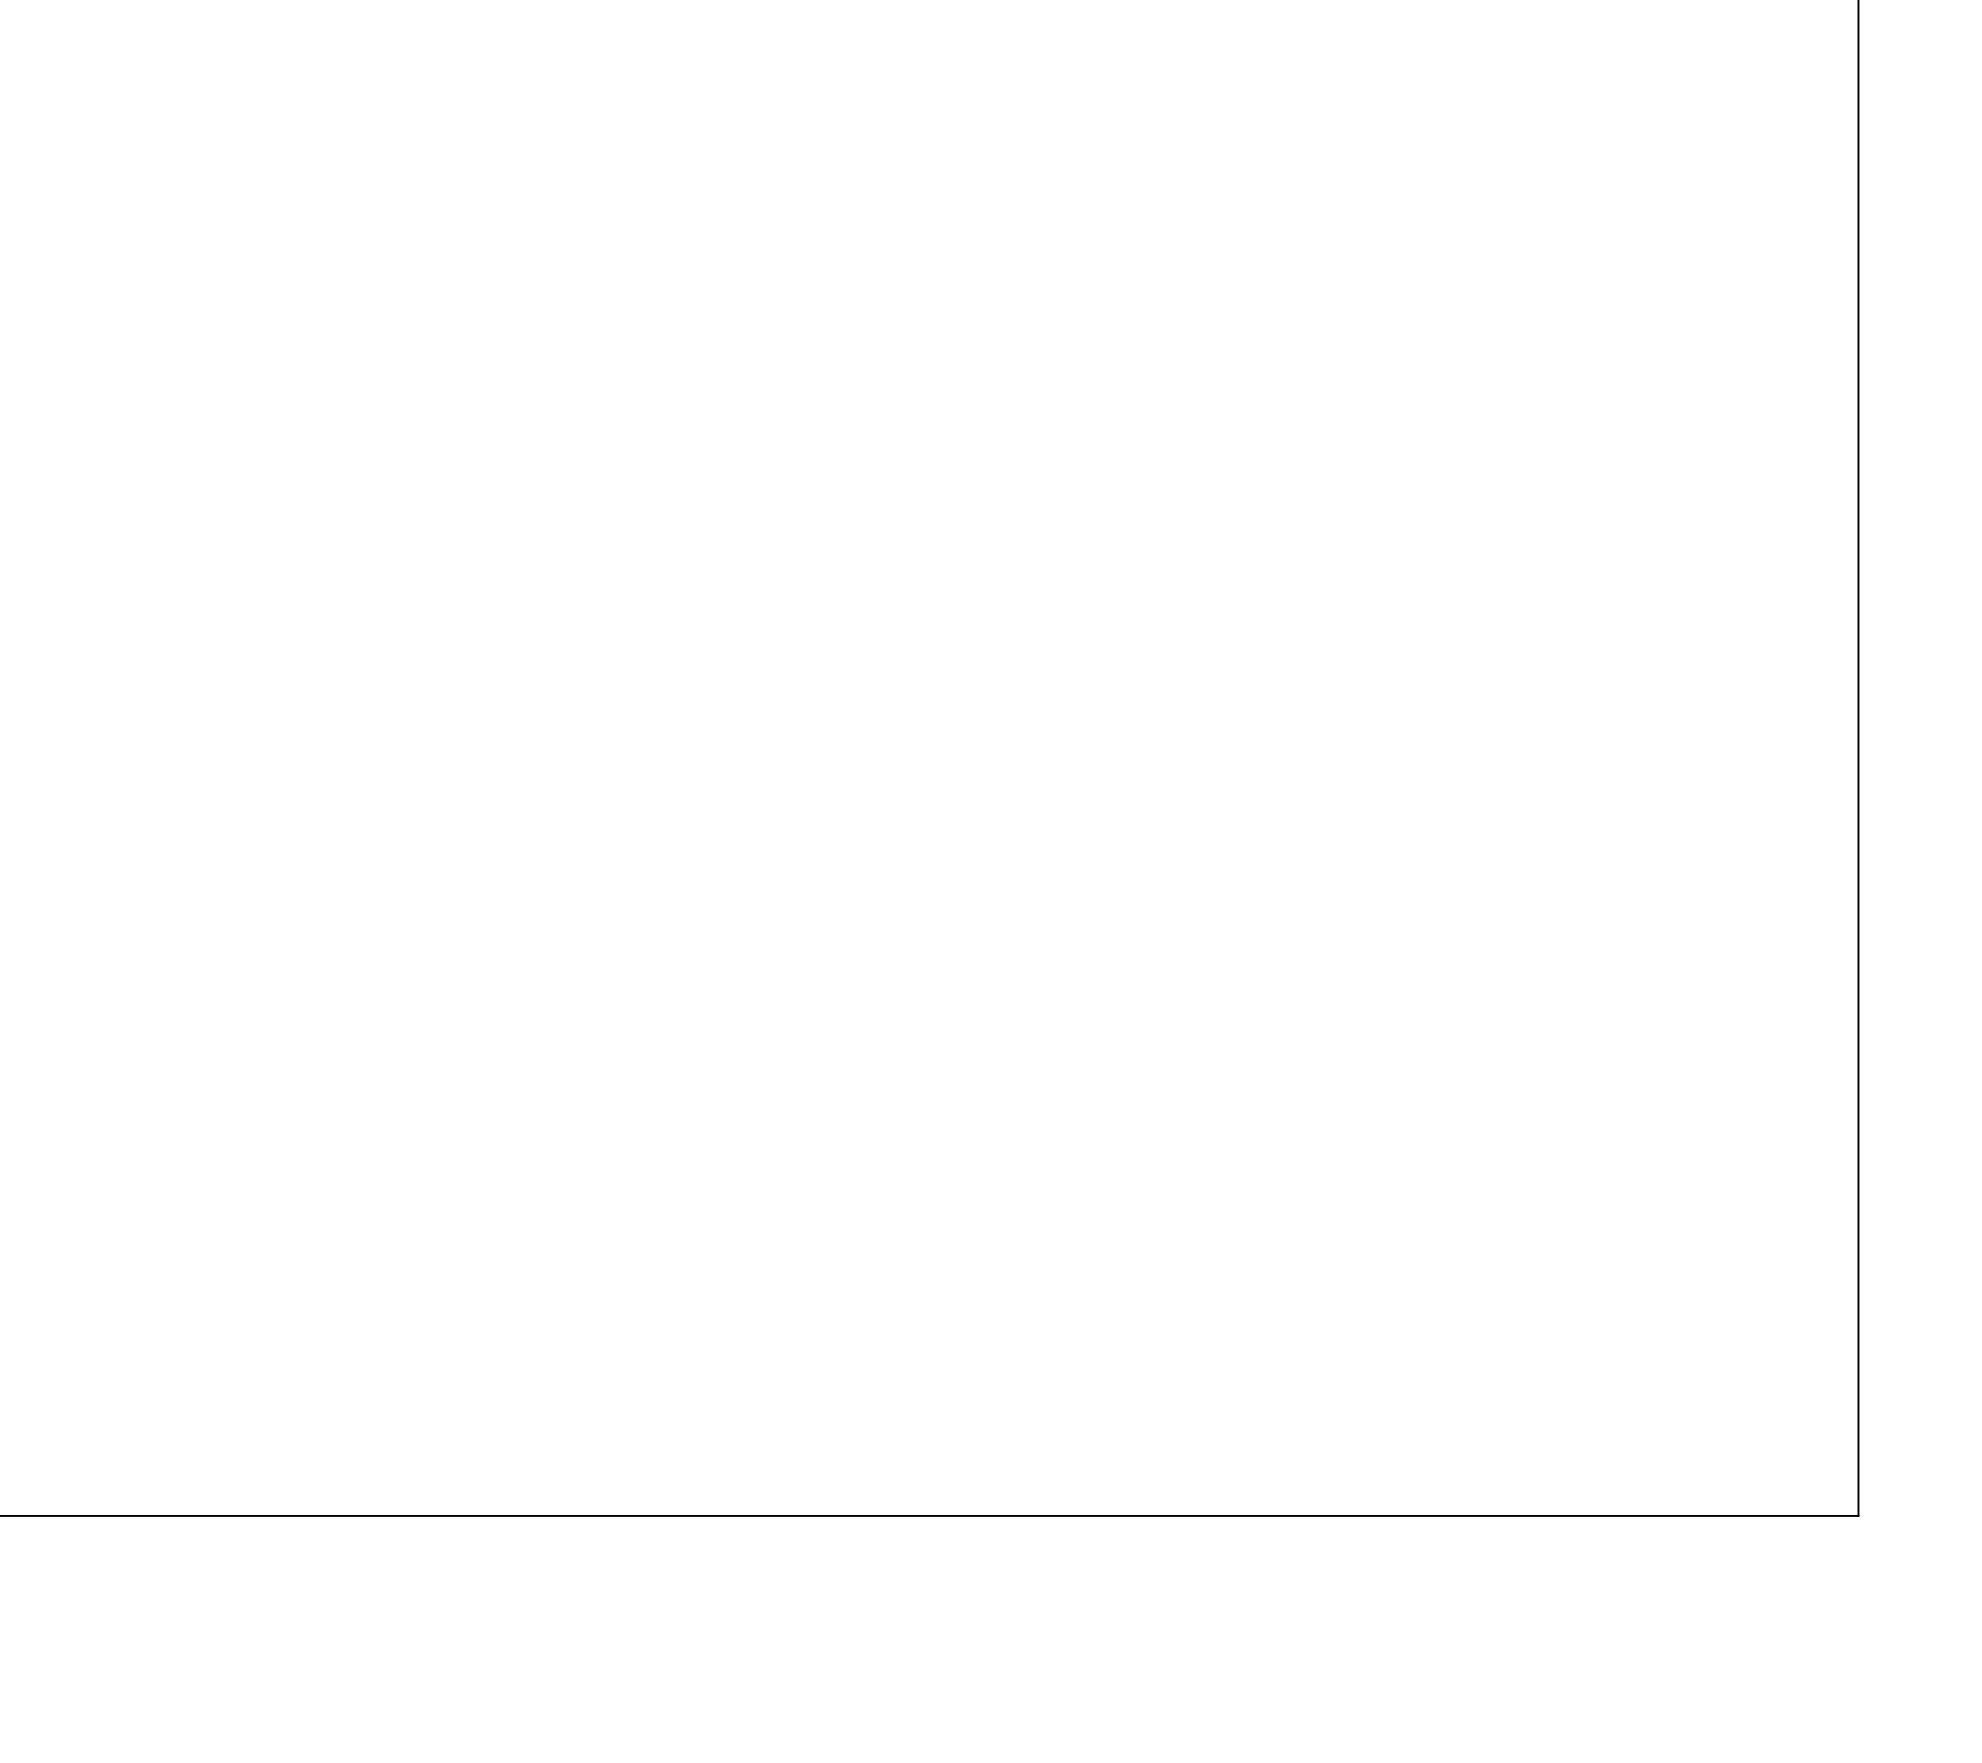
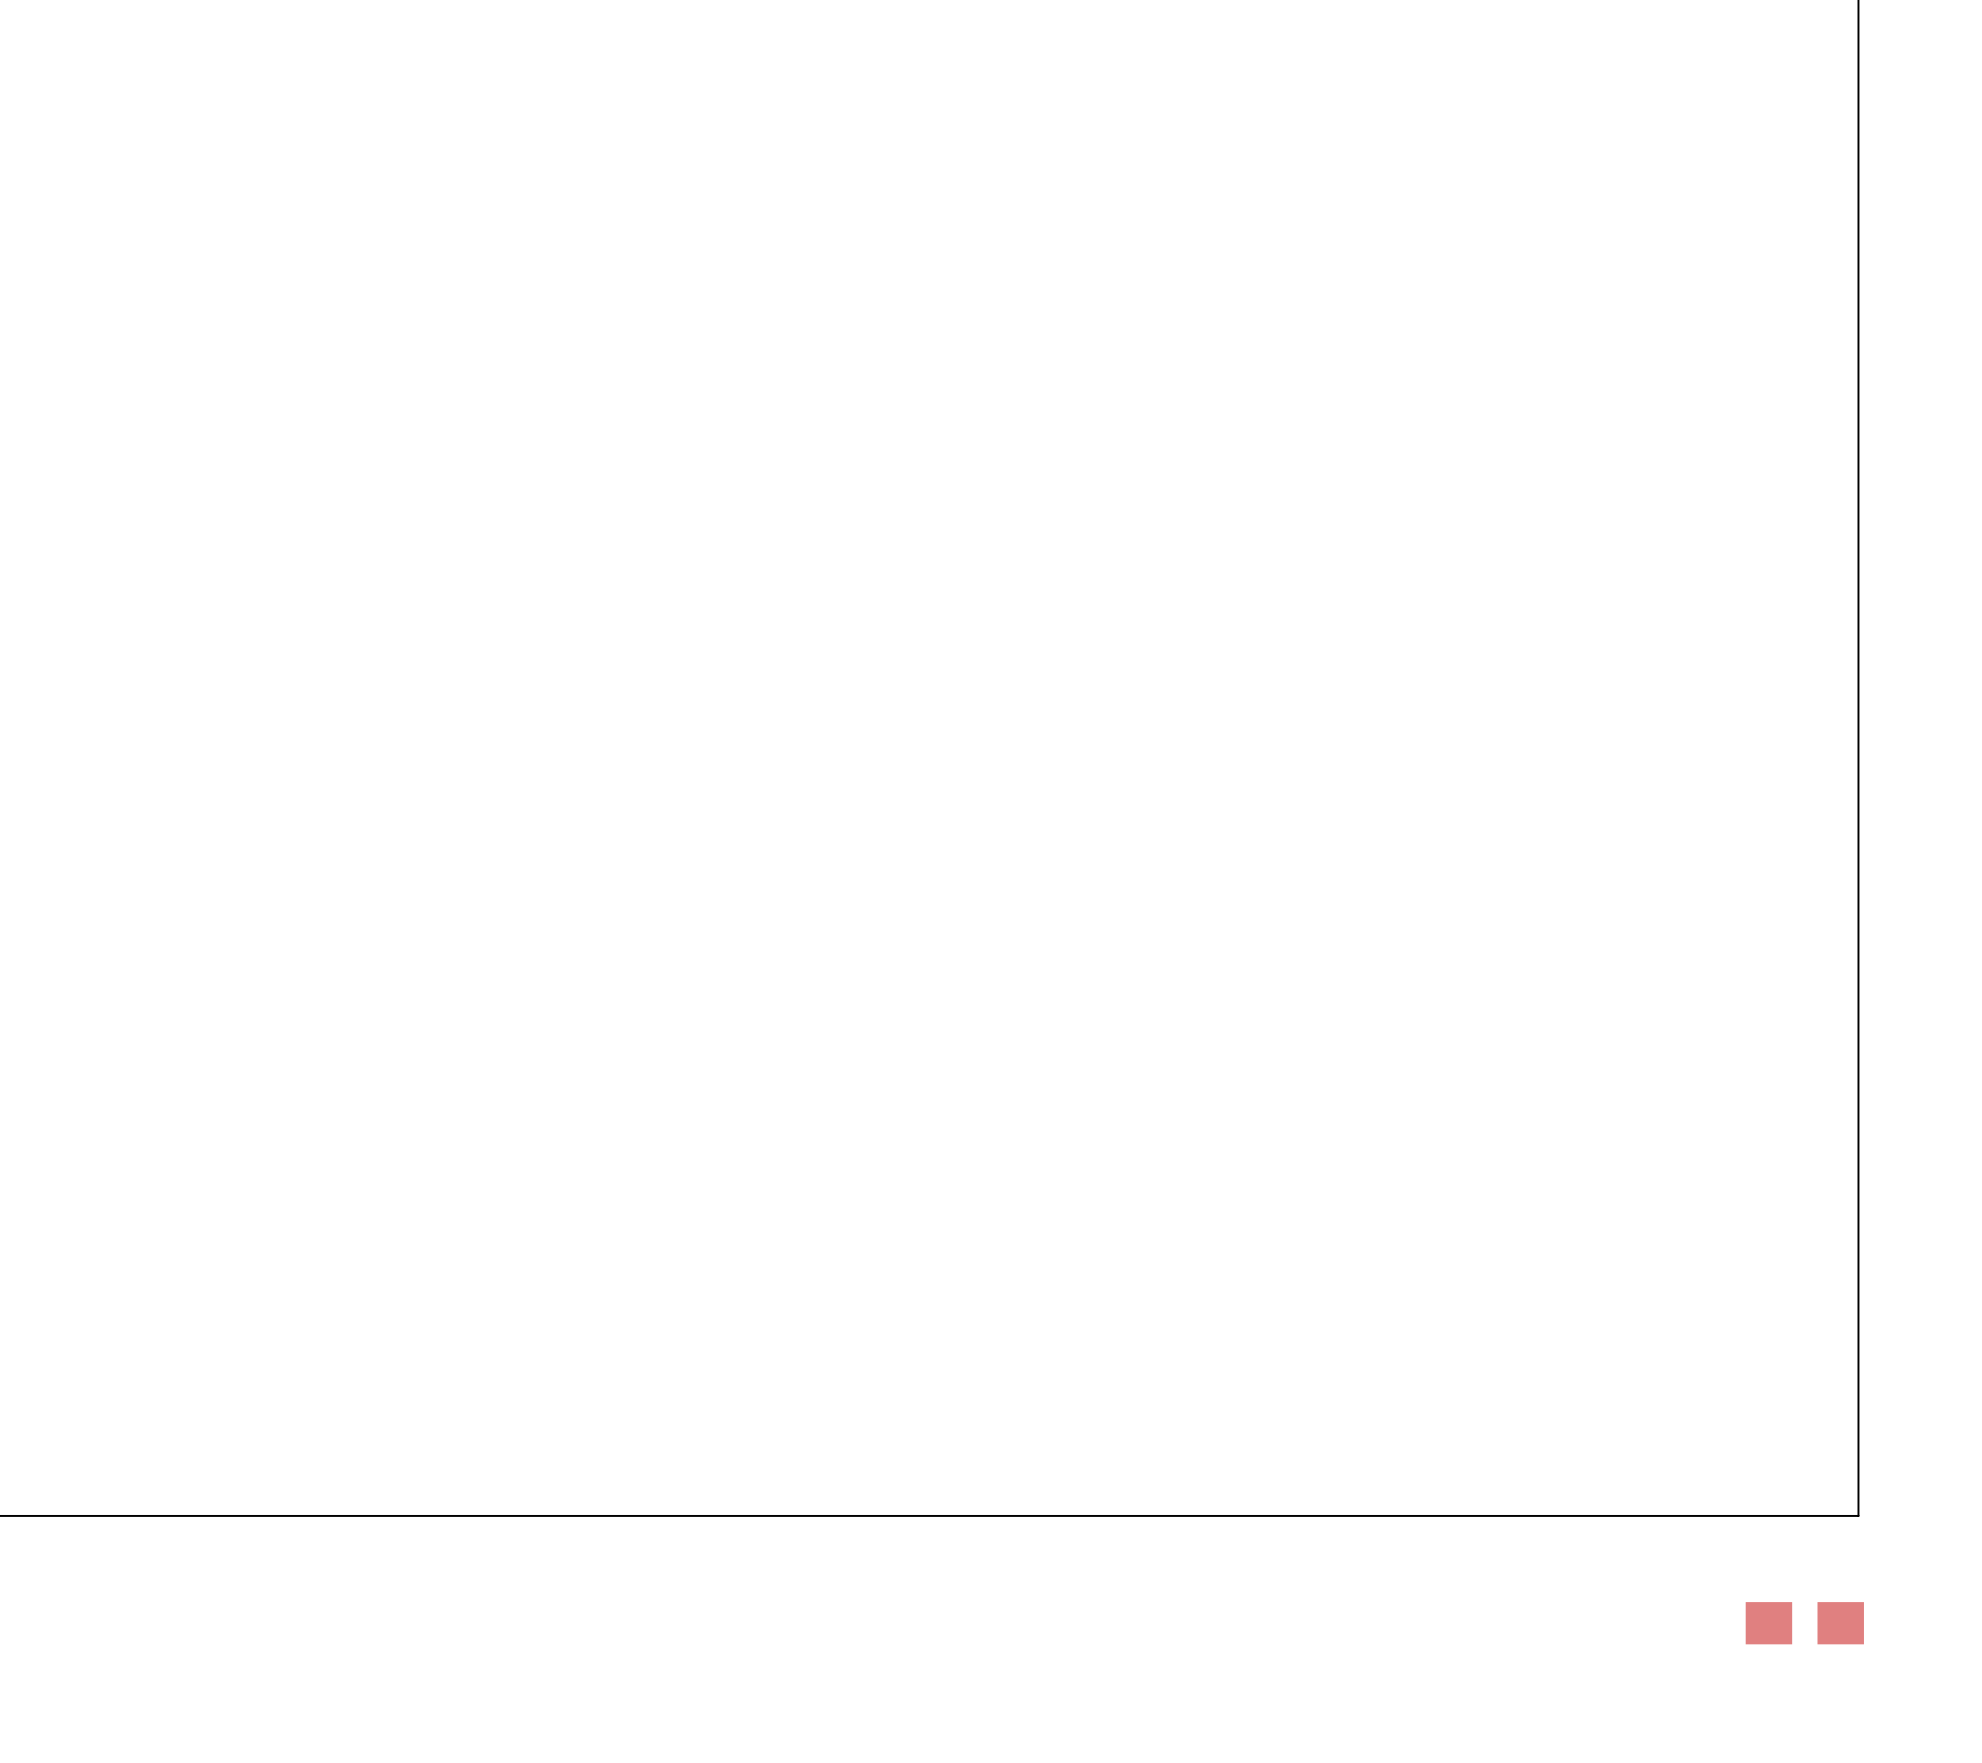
part: none -> (1804, 1623)

